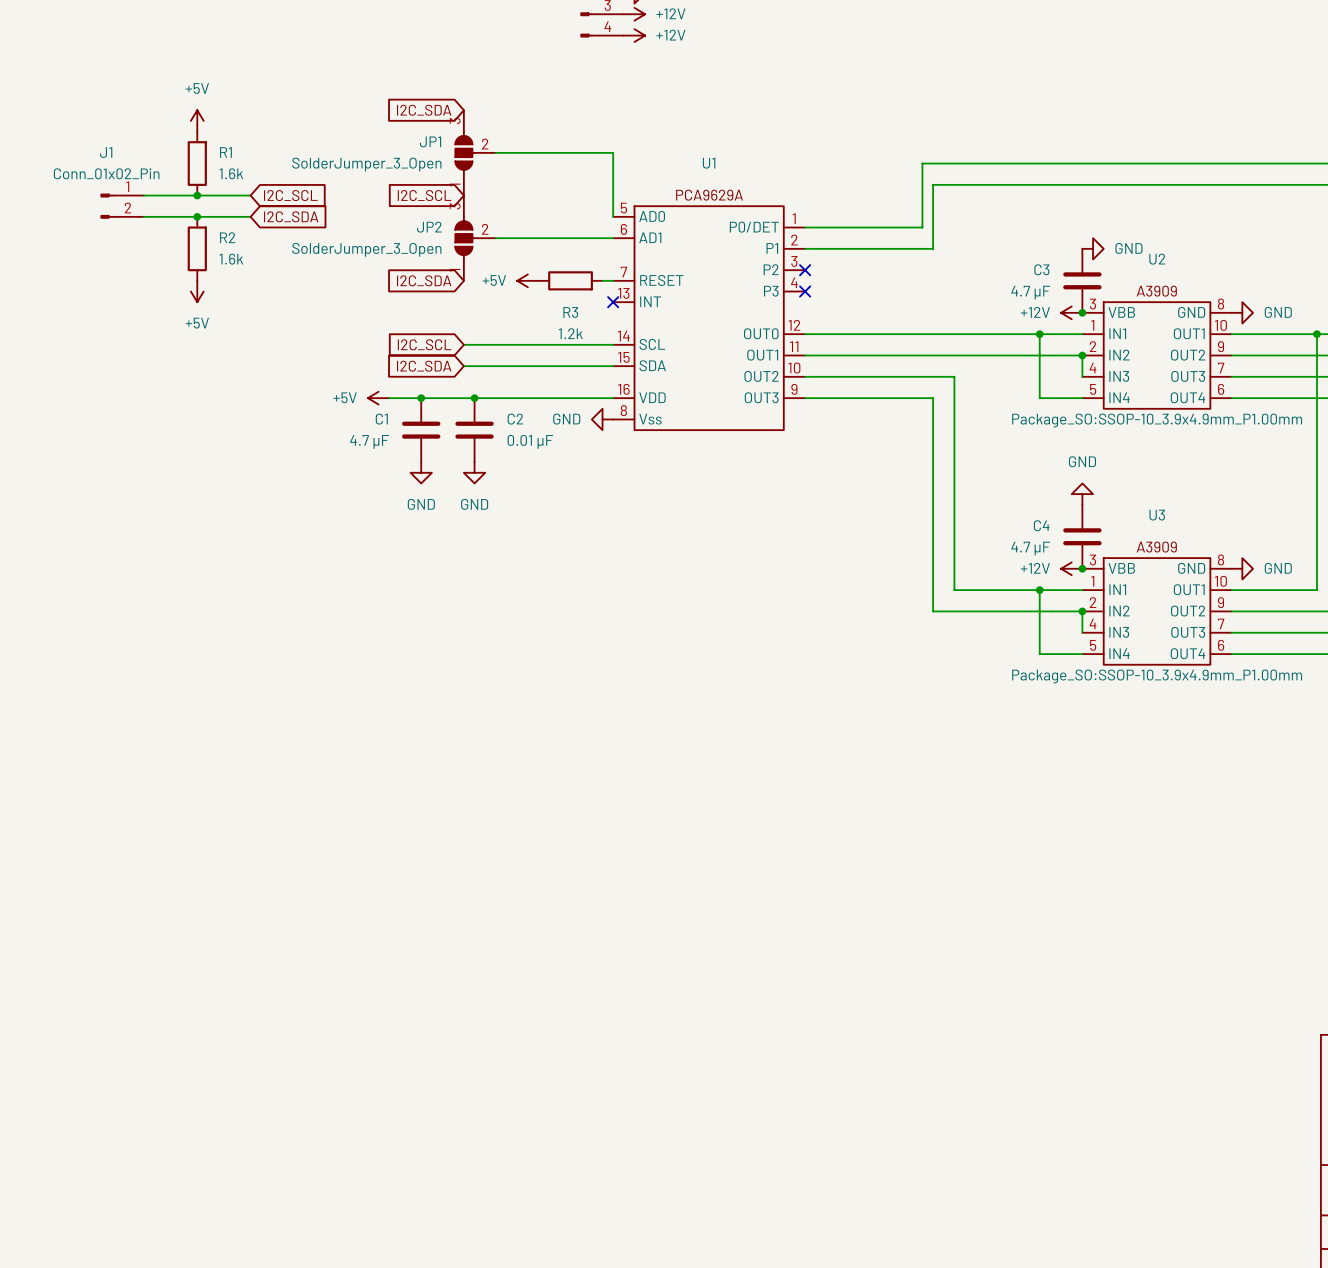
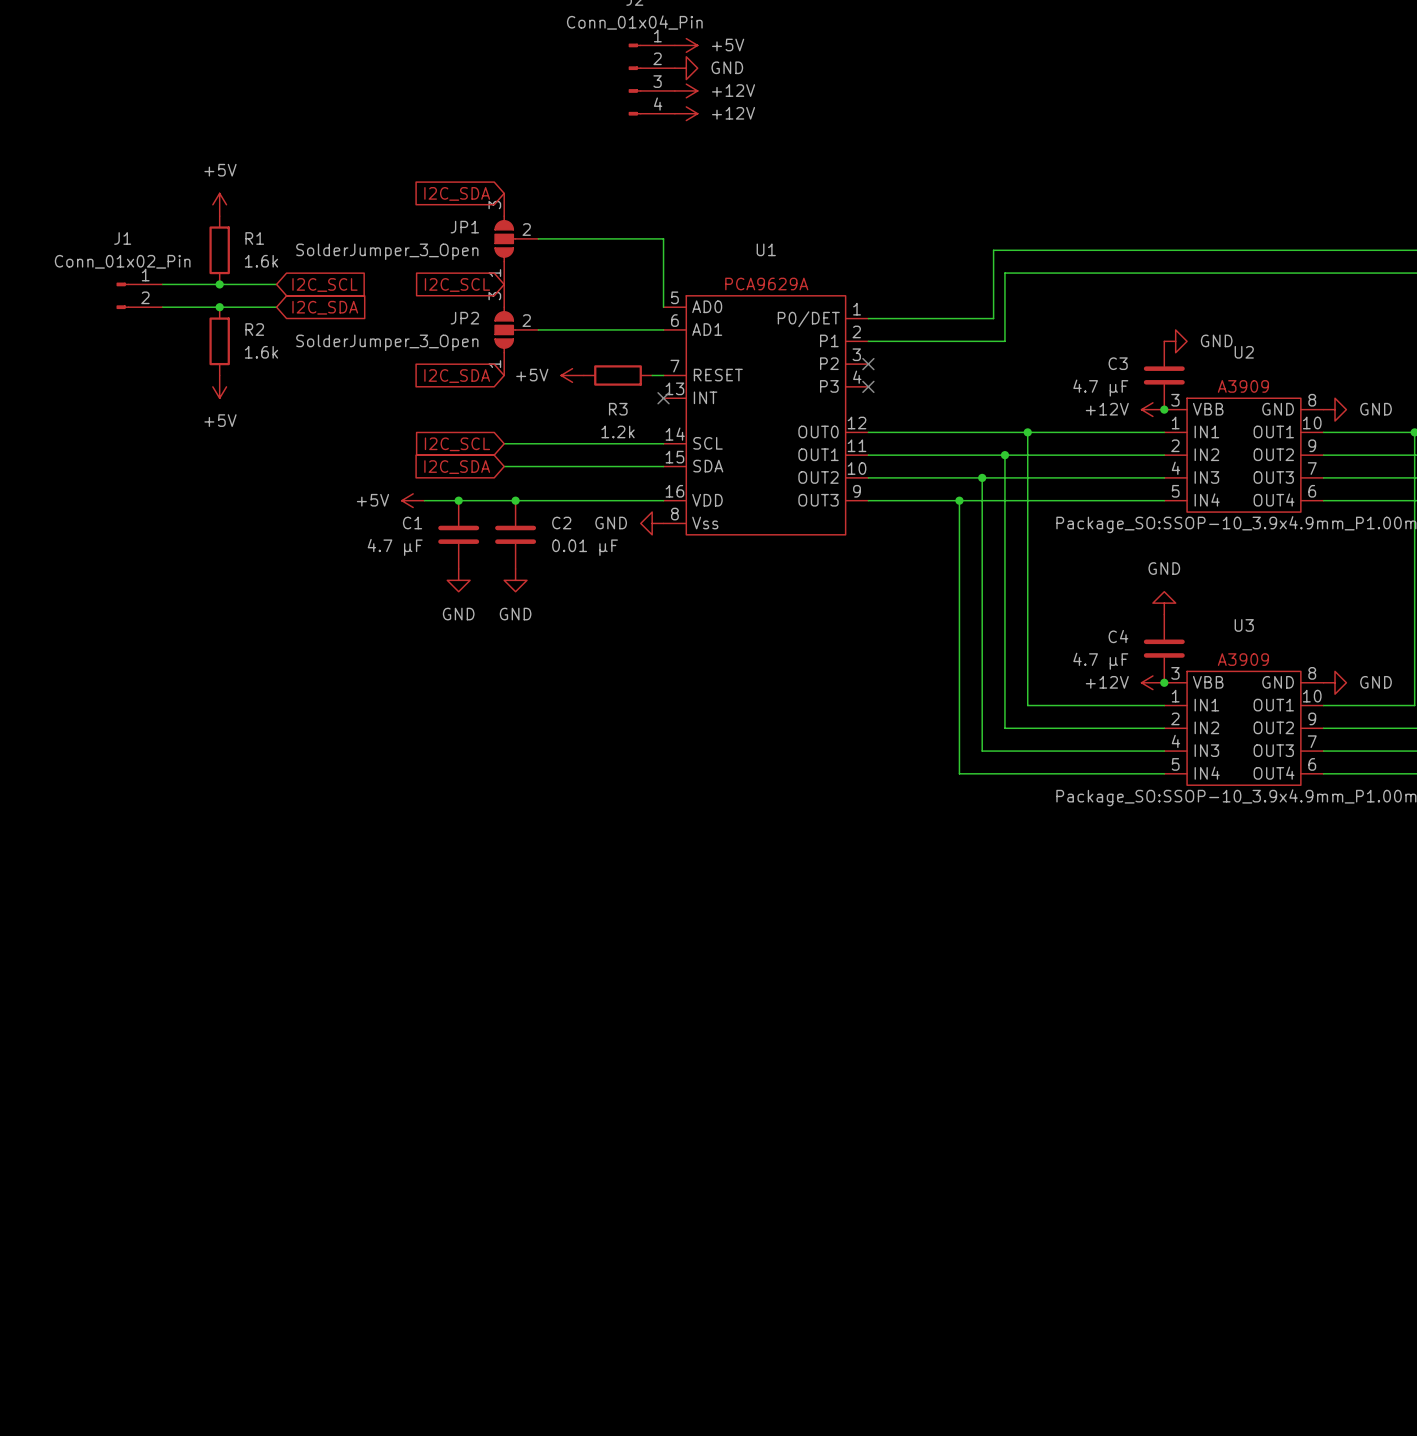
junction: none -> (1027, 432)
wire: (1039, 334) (1039, 398) -> (1004, 455) (1004, 500) (1118, 500)
junction: (1039, 334) -> none
junction: none -> (1004, 455)
wire: (1082, 355) (1082, 376) -> (1027, 432) (1027, 477) (1164, 477)
junction: (1082, 355) -> none
junction: none -> (982, 477)
junction: none -> (959, 500)
wire: (1039, 590) (1039, 654) -> (959, 500) (959, 773) (1118, 773)
junction: (1039, 590) -> none
wire: (1082, 611) (1082, 632) -> (982, 477) (982, 751) (1164, 751)
junction: (1082, 611) -> none

